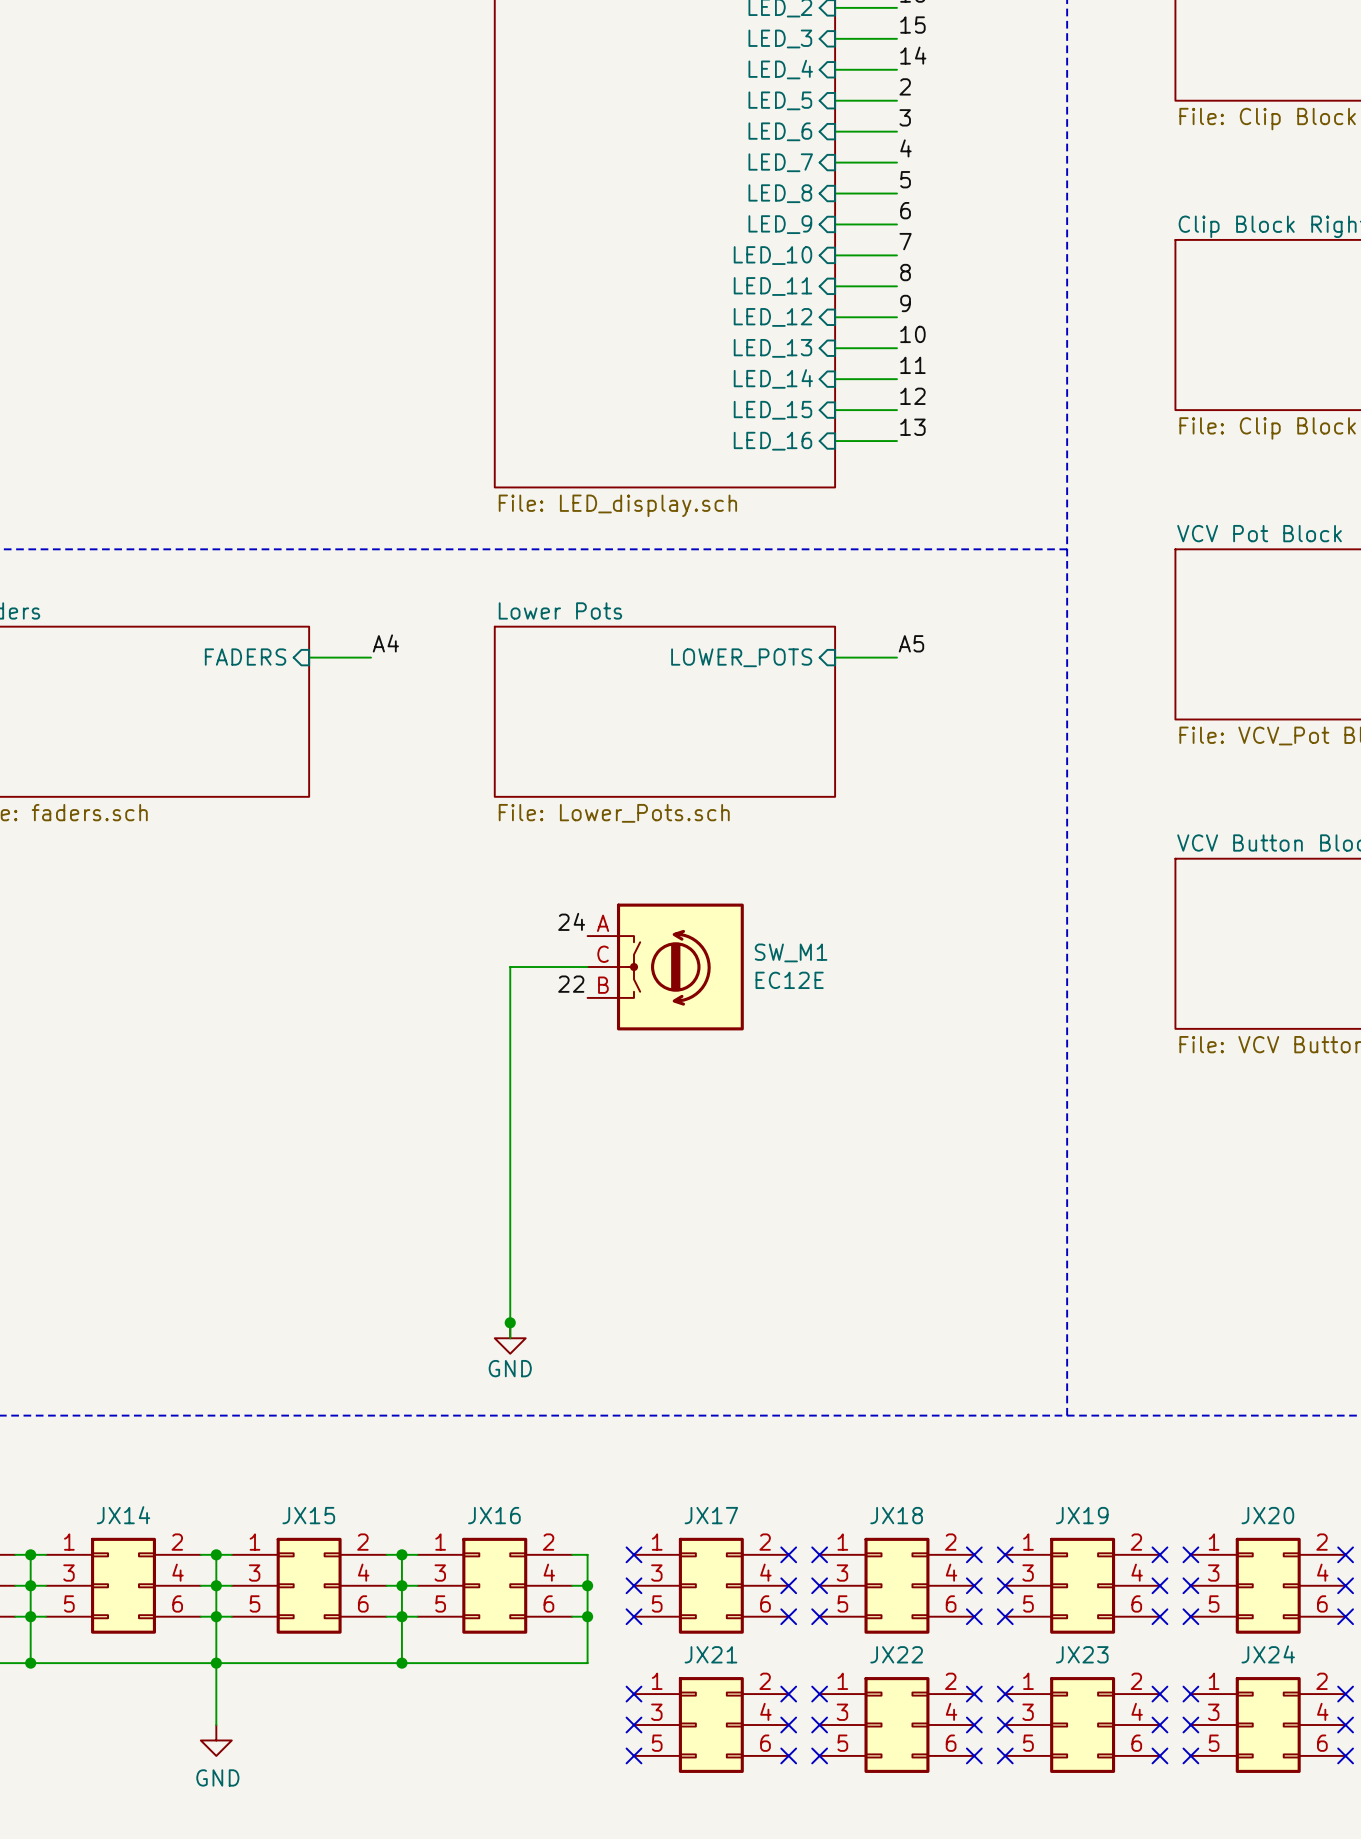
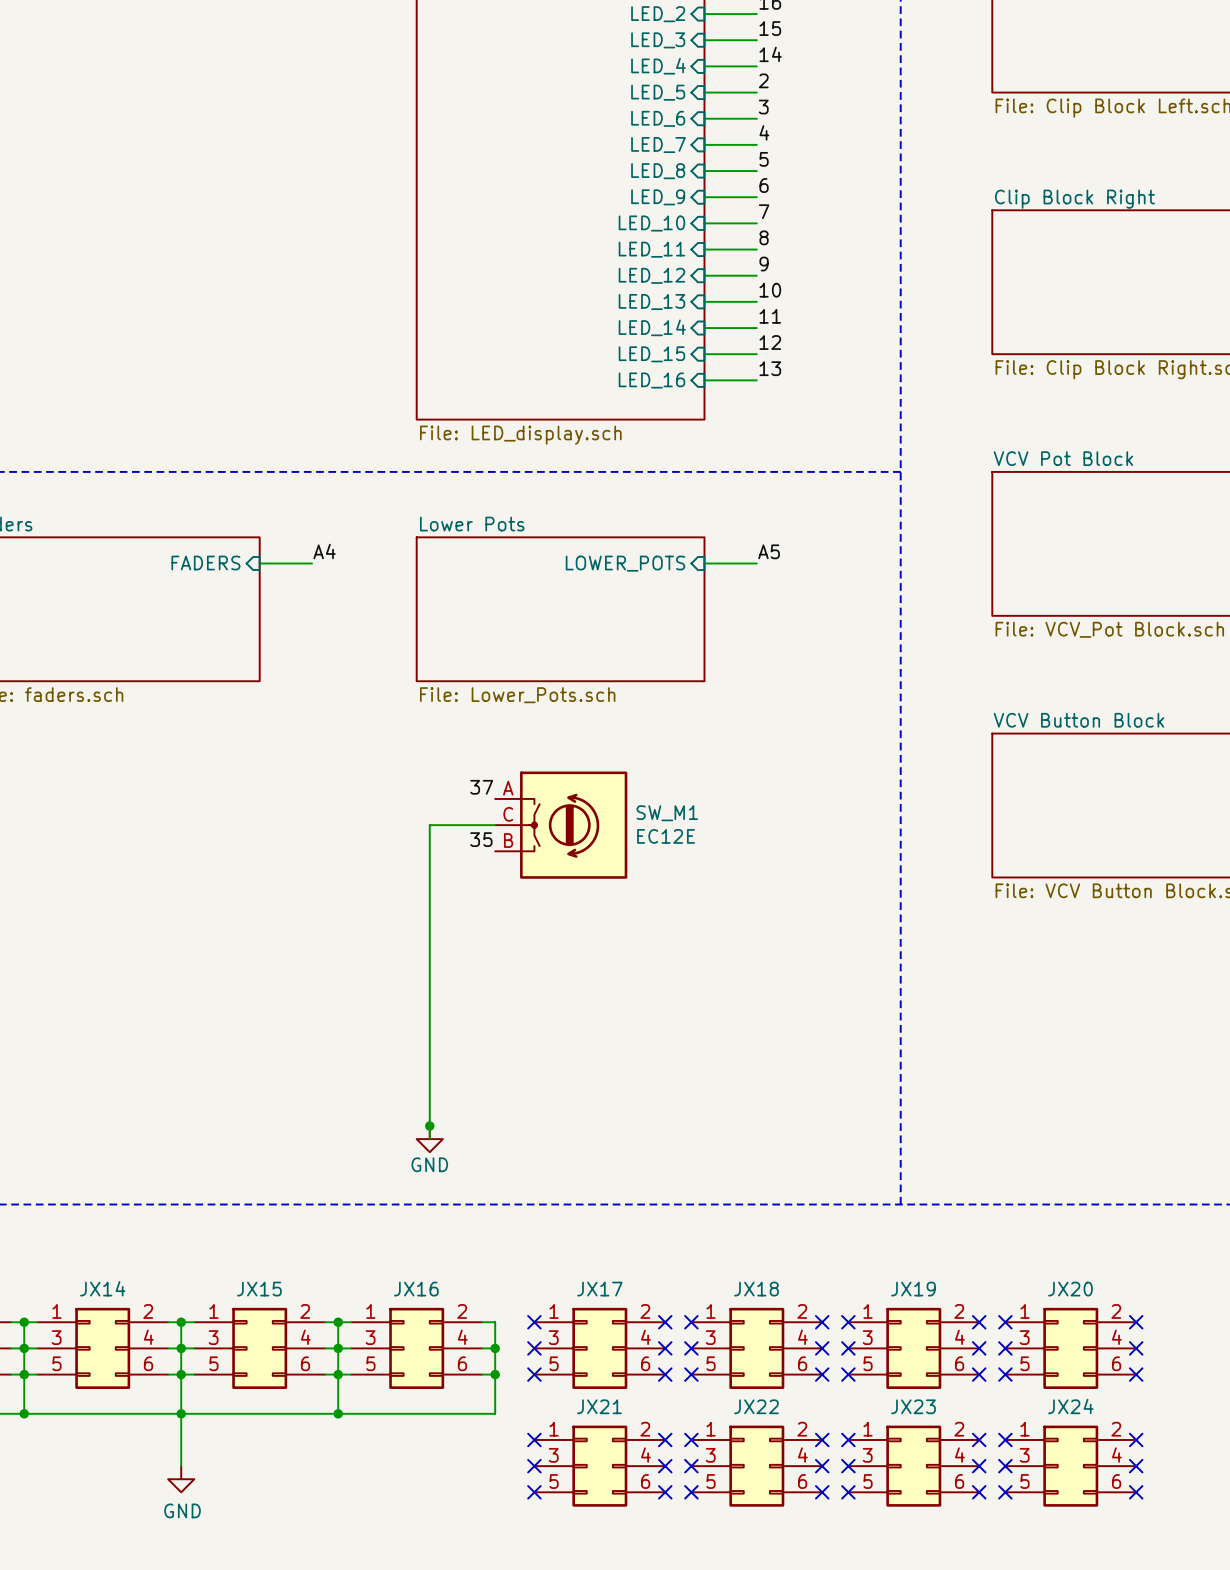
label: 24 (571, 921) -> 37 (481, 787)
label: 22 (571, 984) -> 35 (481, 839)

